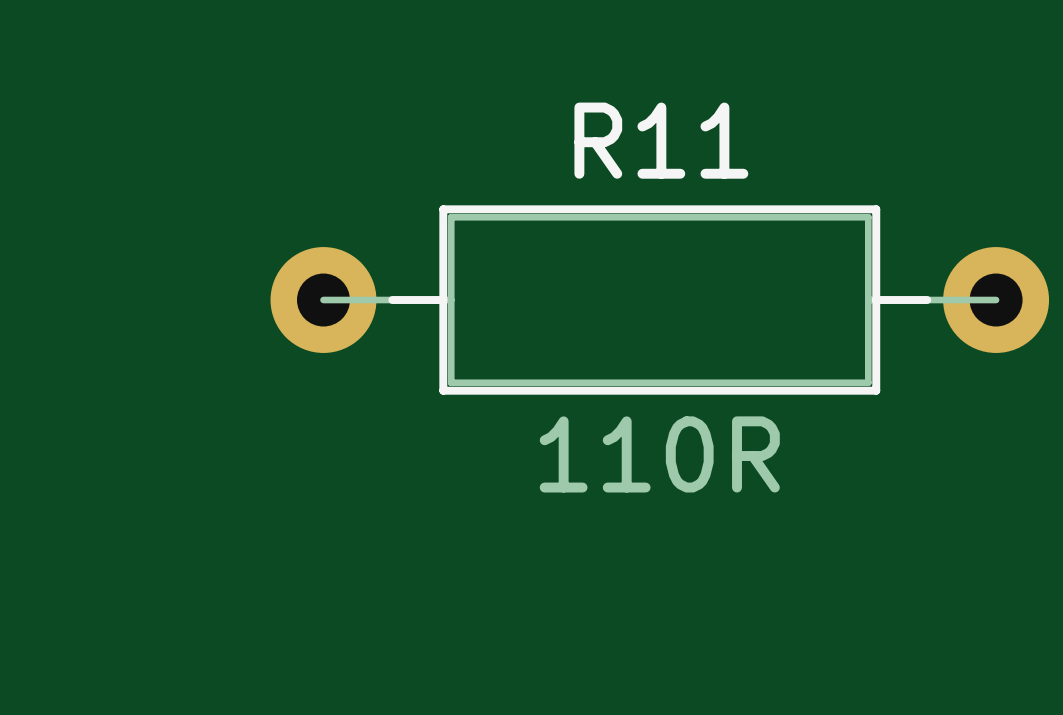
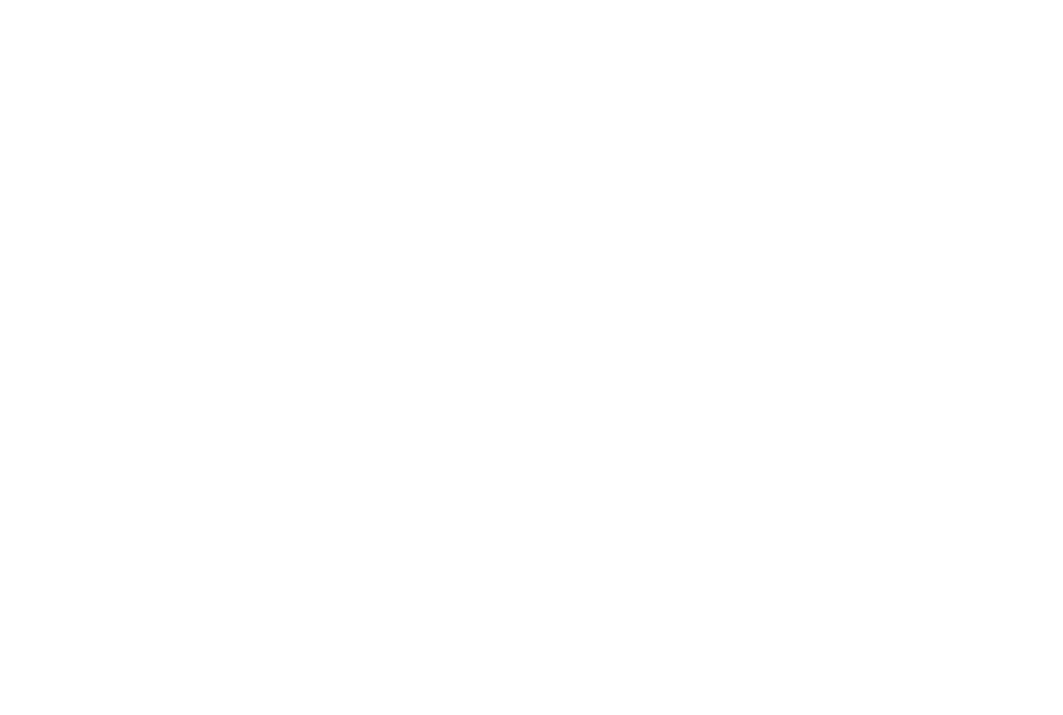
R11: 110R (659, 300) -> none

